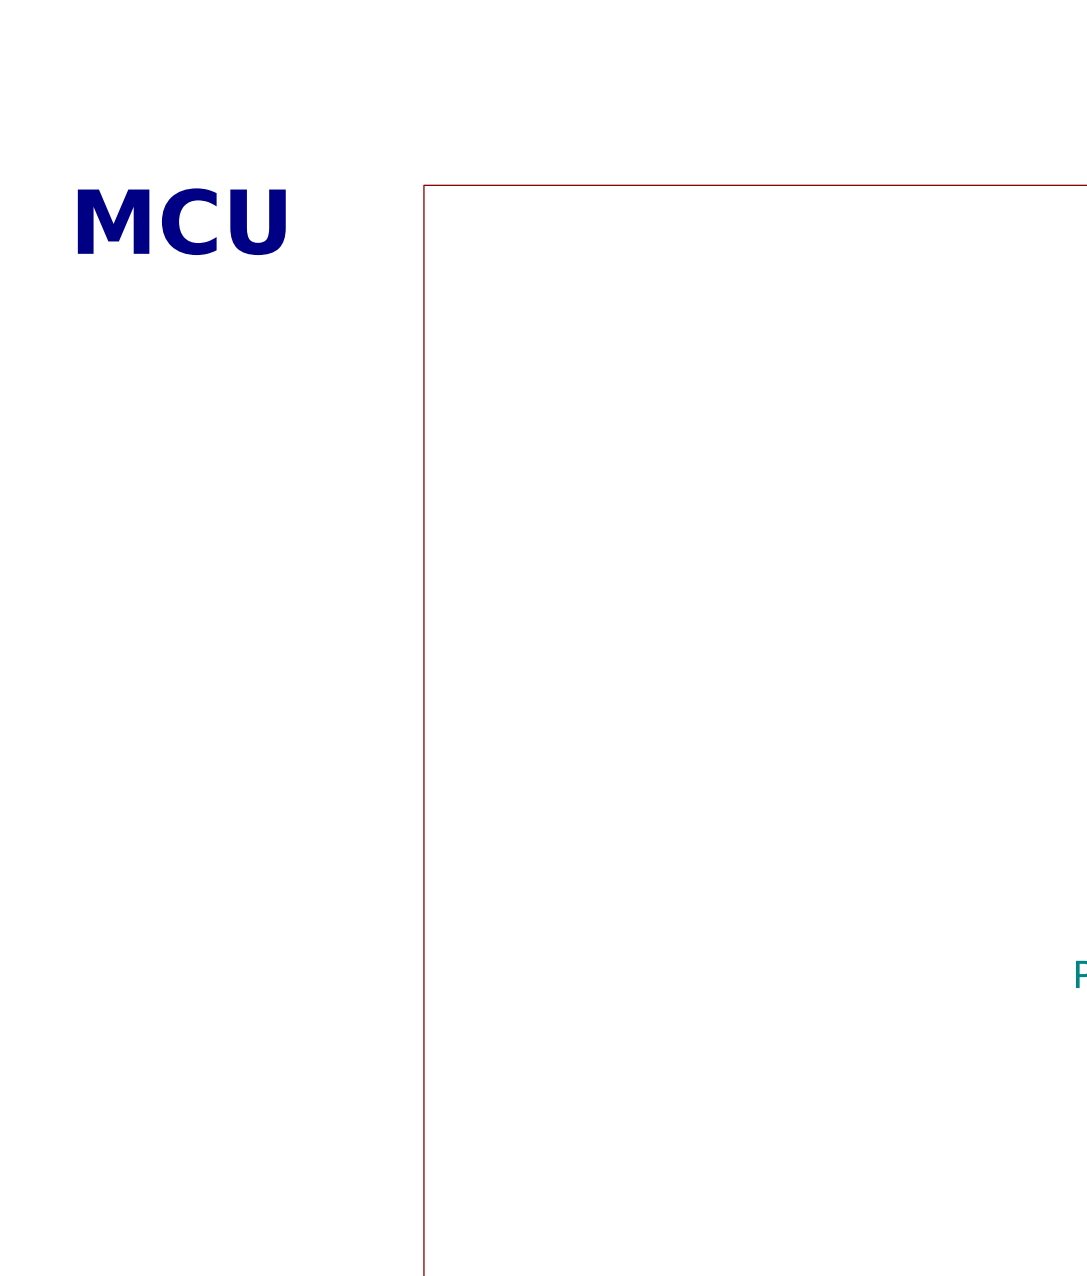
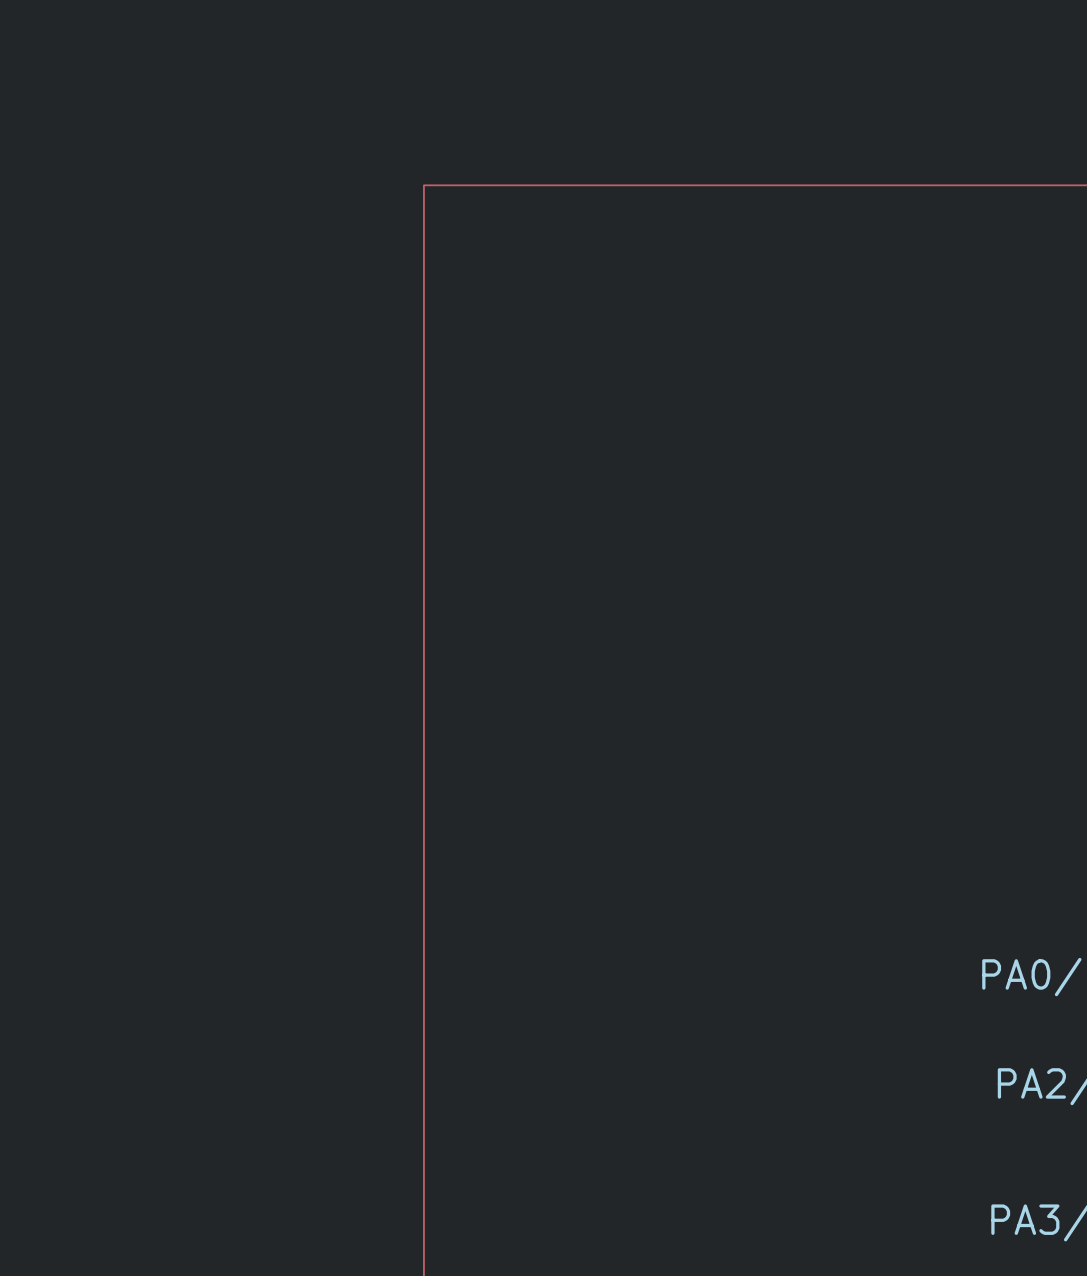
text: MCU (181, 221) -> none

